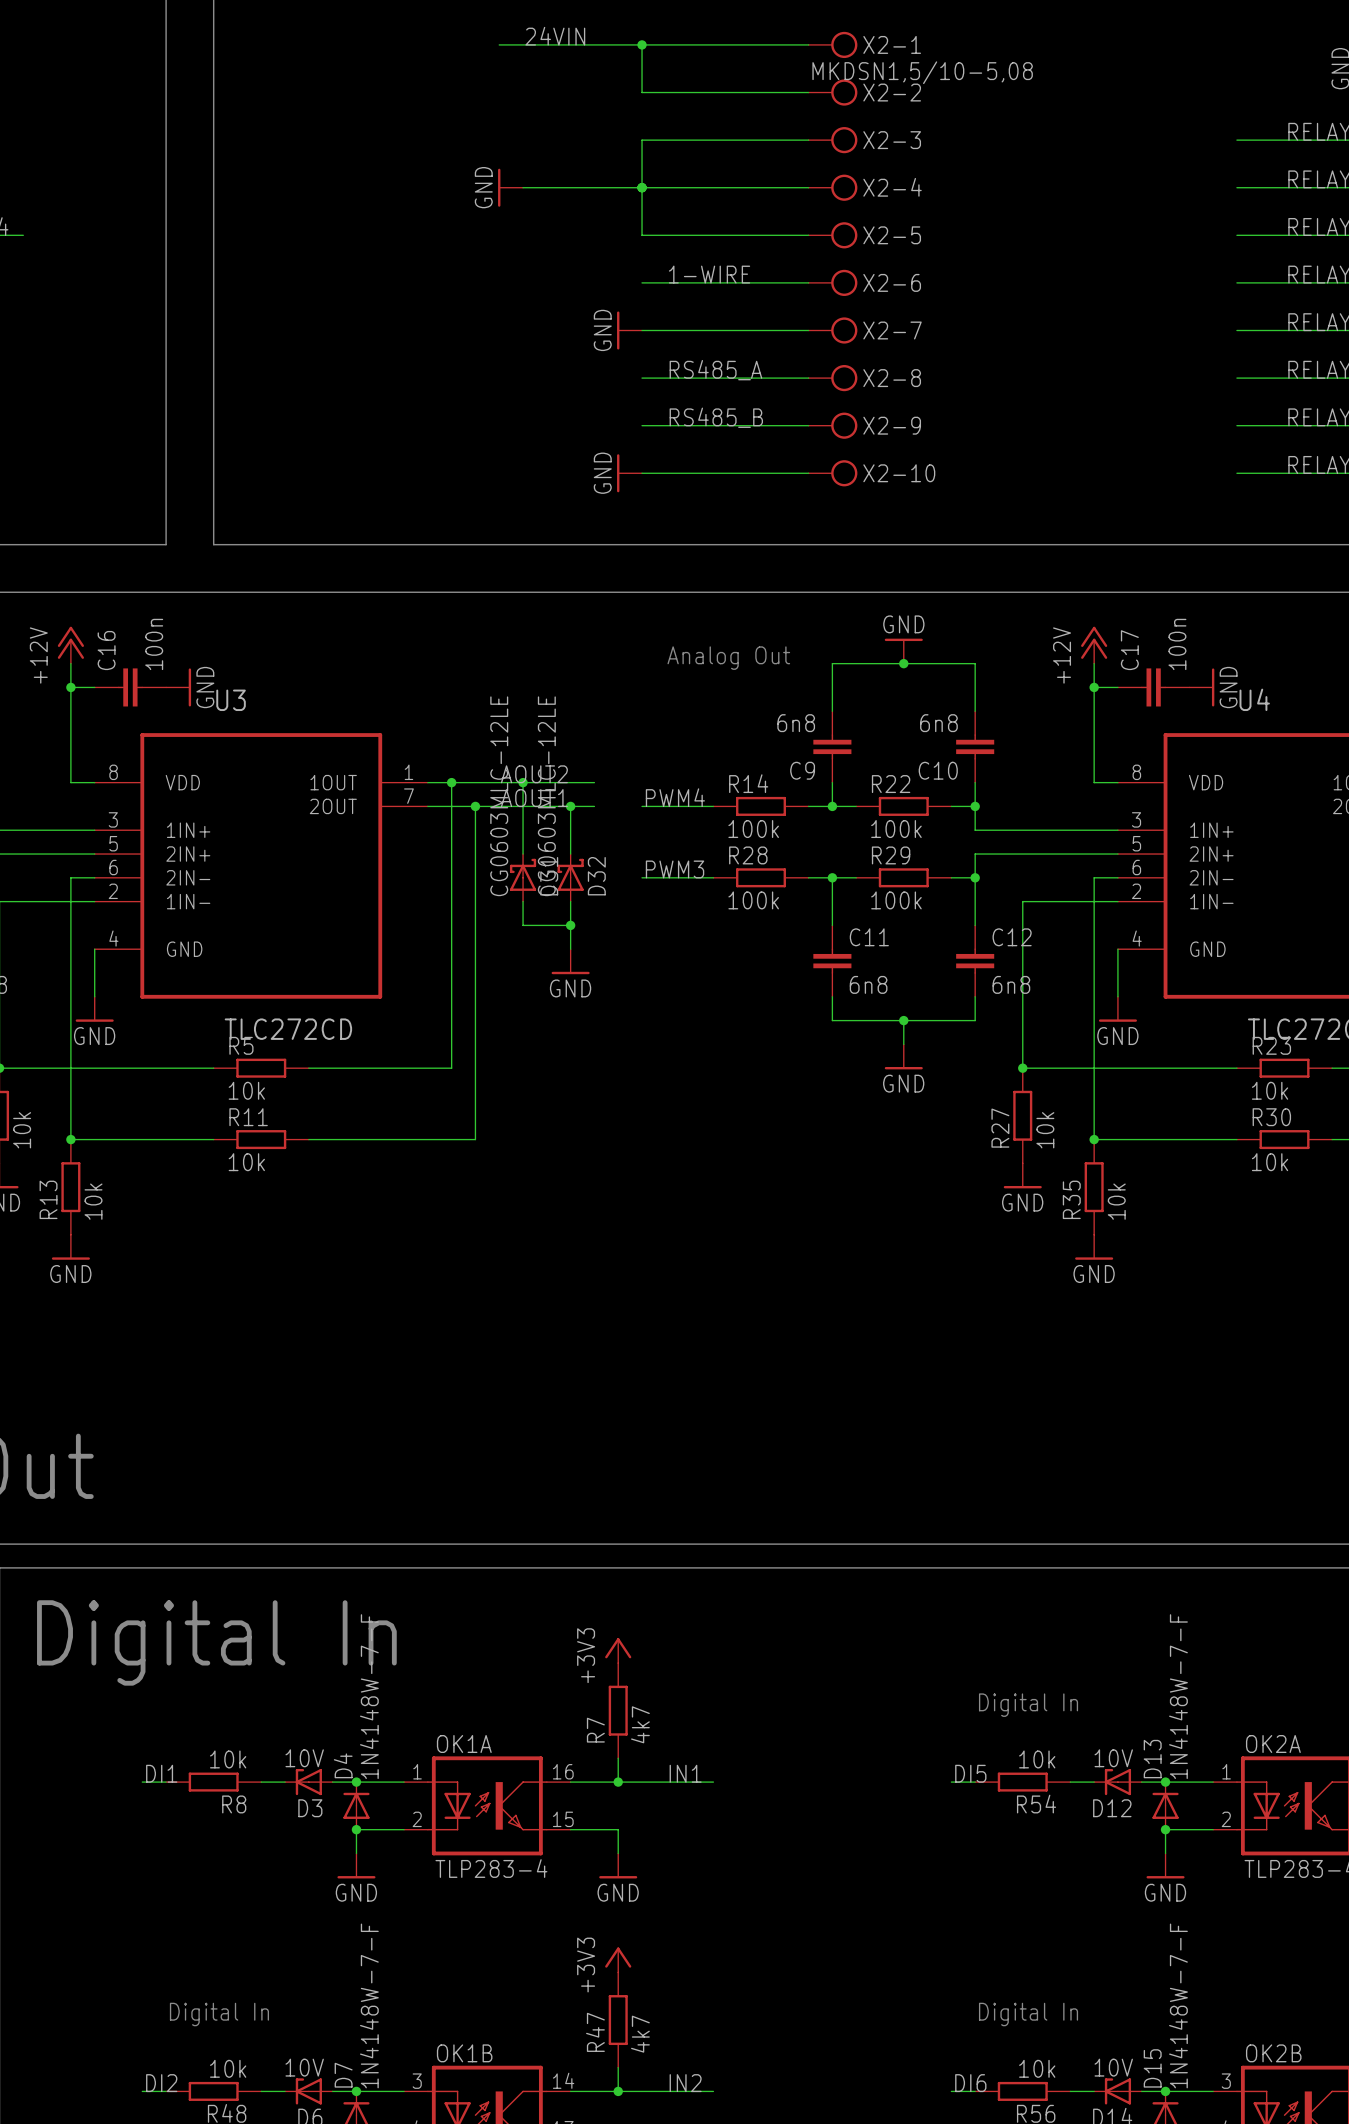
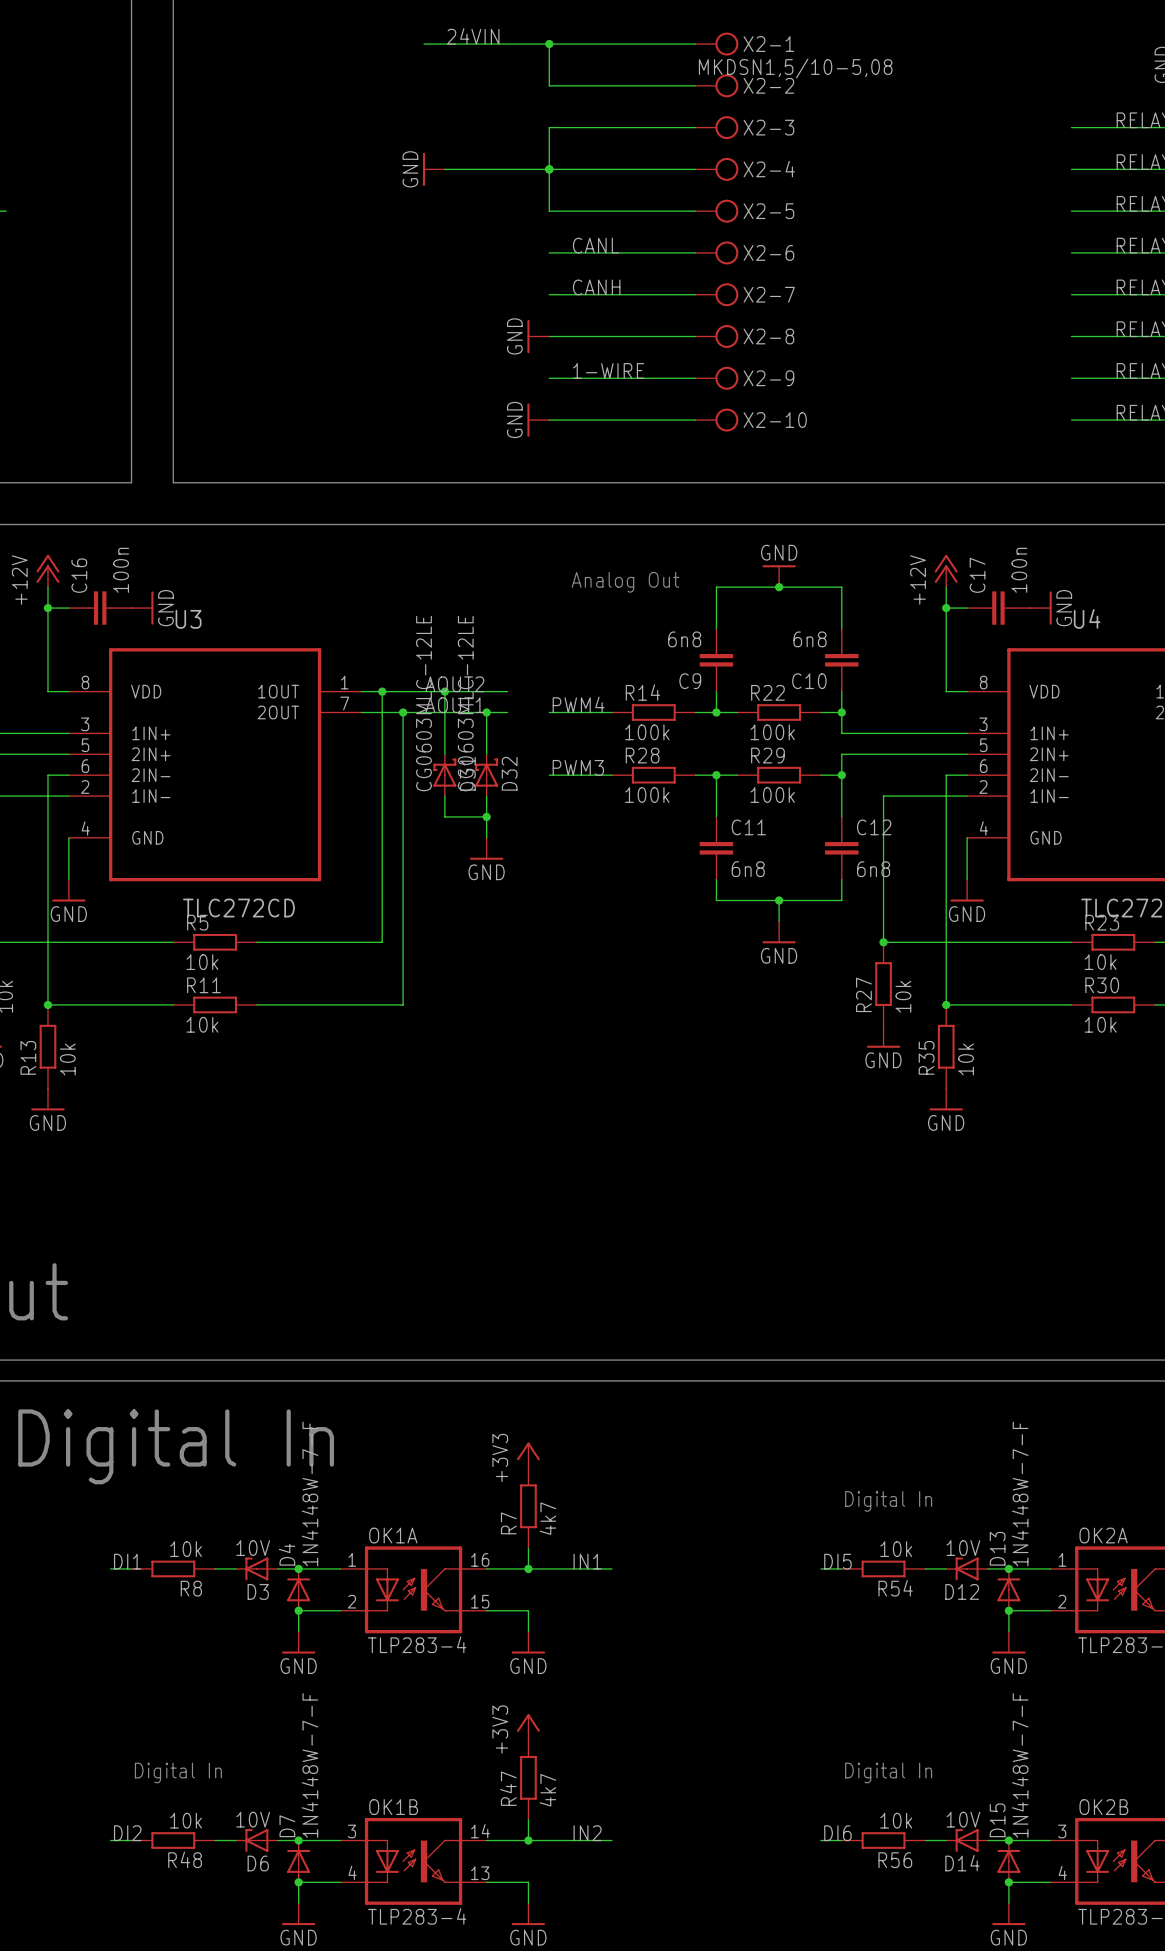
label: 1-WIRE (709, 274) -> CANL (596, 245)
label: none -> CANH (596, 287)
power symbol position: GND (629, 330) -> GND (538, 336)
label: RS485_A (715, 370) -> none
label: RS485_B (716, 417) -> 1-WIRE (608, 370)

